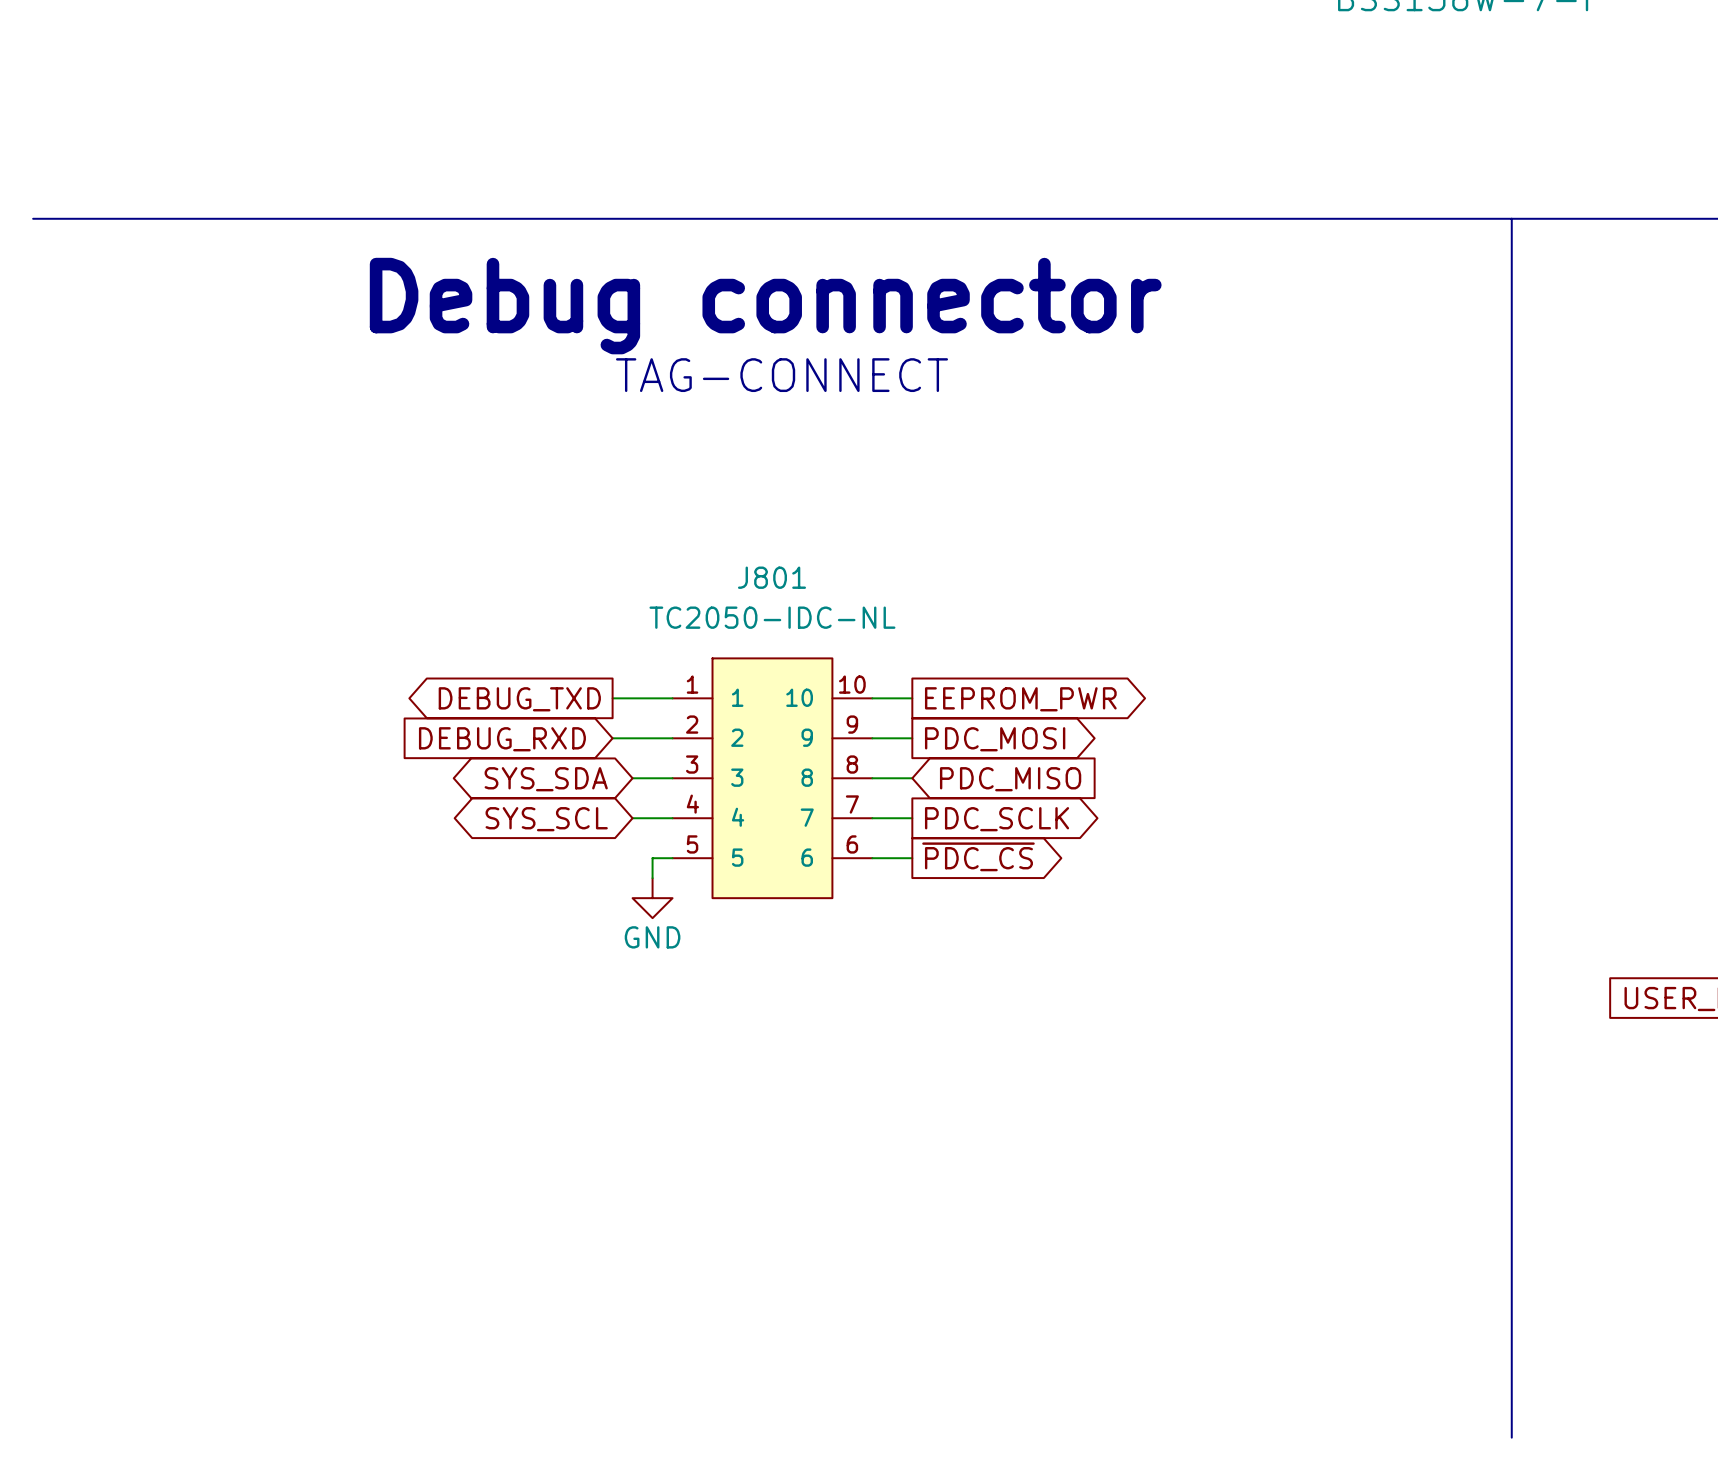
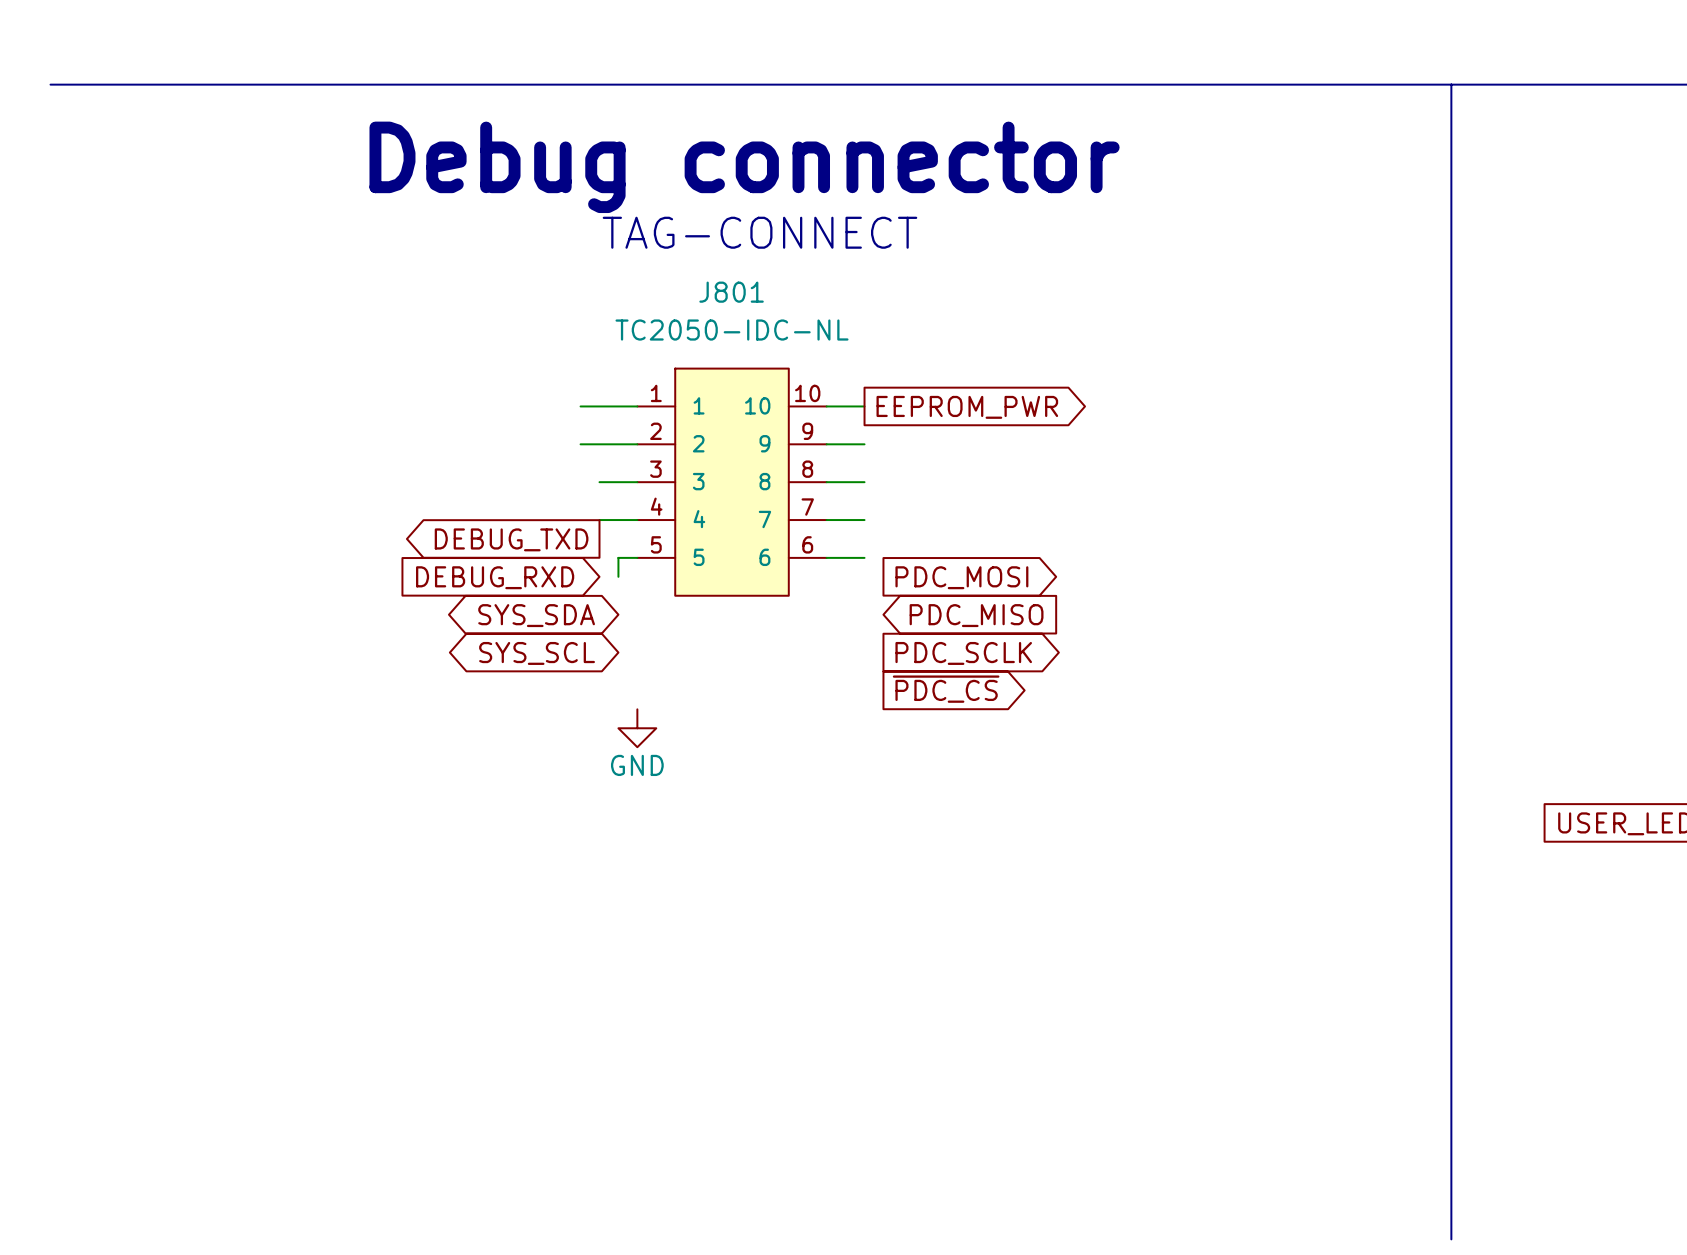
wire: (612, 698) (672, 698) -> (580, 406) (637, 406)
wire: (872, 698) (912, 698) -> (826, 406) (864, 406)
global label position: EEPROM_PWR (1020, 699) -> EEPROM_PWR (967, 407)
wire: (612, 738) (672, 738) -> (580, 444) (637, 444)
wire: (872, 738) (912, 738) -> (826, 444) (864, 444)
wire: (632, 778) (672, 778) -> (599, 482) (637, 482)
J801 position: (772, 778) -> (732, 482)
wire: (872, 778) (912, 778) -> (826, 482) (864, 482)
wire: (632, 818) (672, 818) -> (599, 520) (637, 520)
wire: (872, 818) (912, 818) -> (826, 520) (864, 520)
wire: (672, 858) (652, 858) (652, 878) -> (637, 557) (618, 557) (618, 576)
wire: (872, 858) (912, 858) -> (826, 557) (864, 557)

